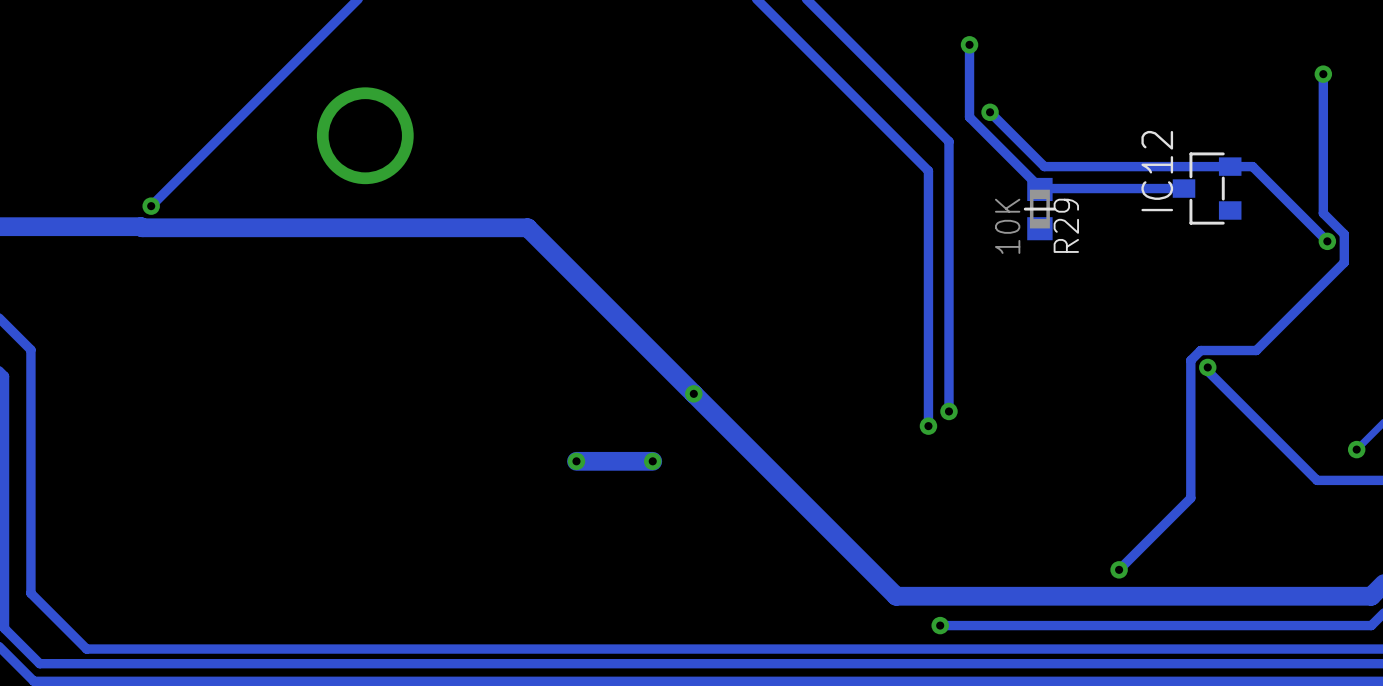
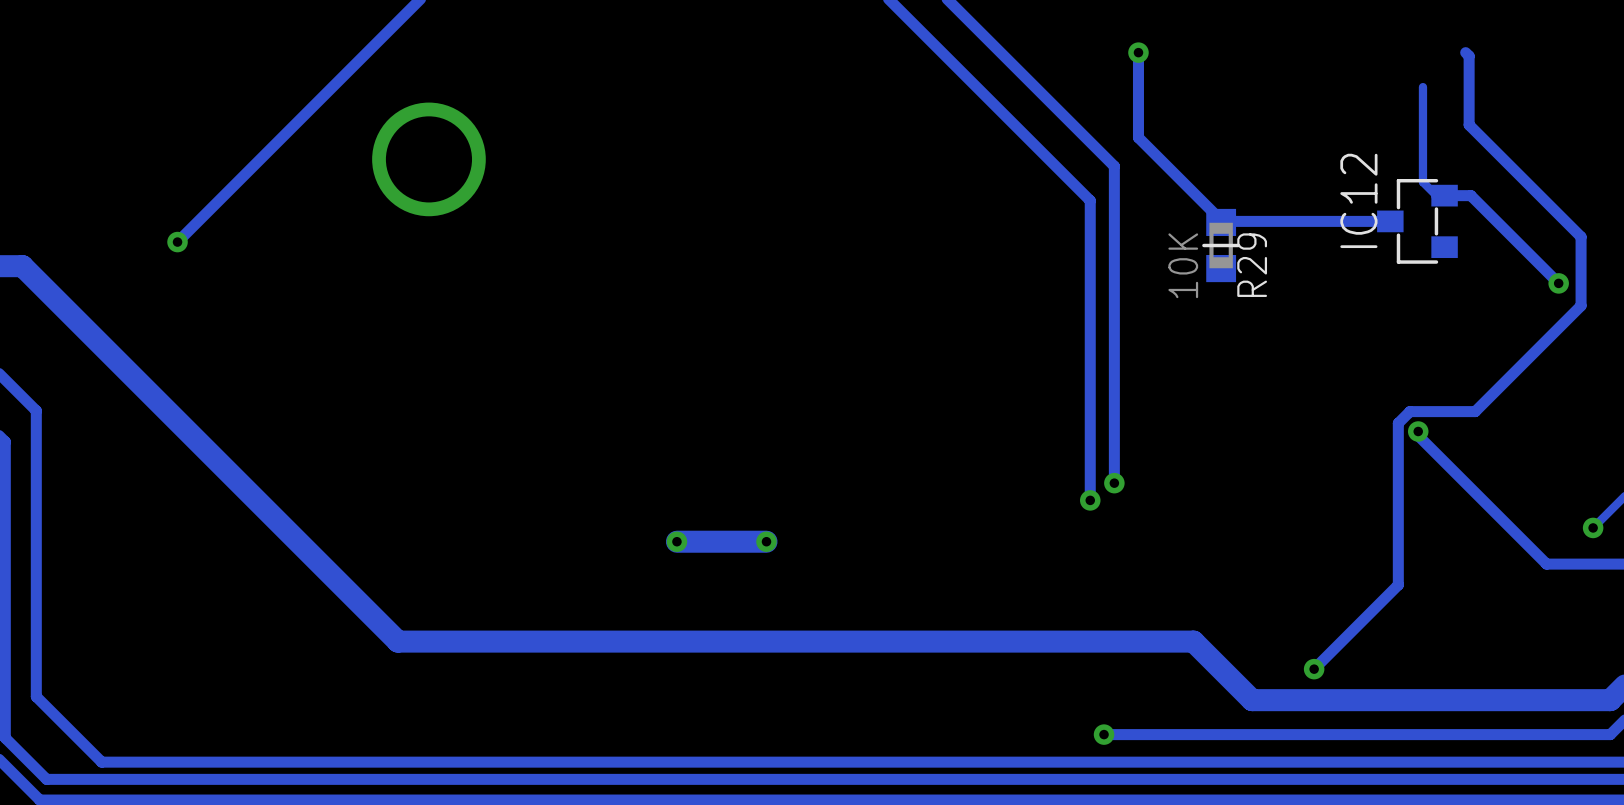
track: (1323, 74) (1323, 213) (1344, 234) (1344, 262) -> (1465, 52) (1469, 56) (1469, 124) (1581, 236) (1581, 305) (1578, 308)
via: (1323, 74) -> none
track: (990, 112) (1044, 166) (1223, 166) -> (1422, 87) (1422, 182) (1436, 195)
via: (990, 112) -> none
track: (19, 226) (527, 227) (896, 596) (1066, 596) -> (22, 266) (397, 641) (1193, 641) (1252, 700)
via: (693, 393) -> none

